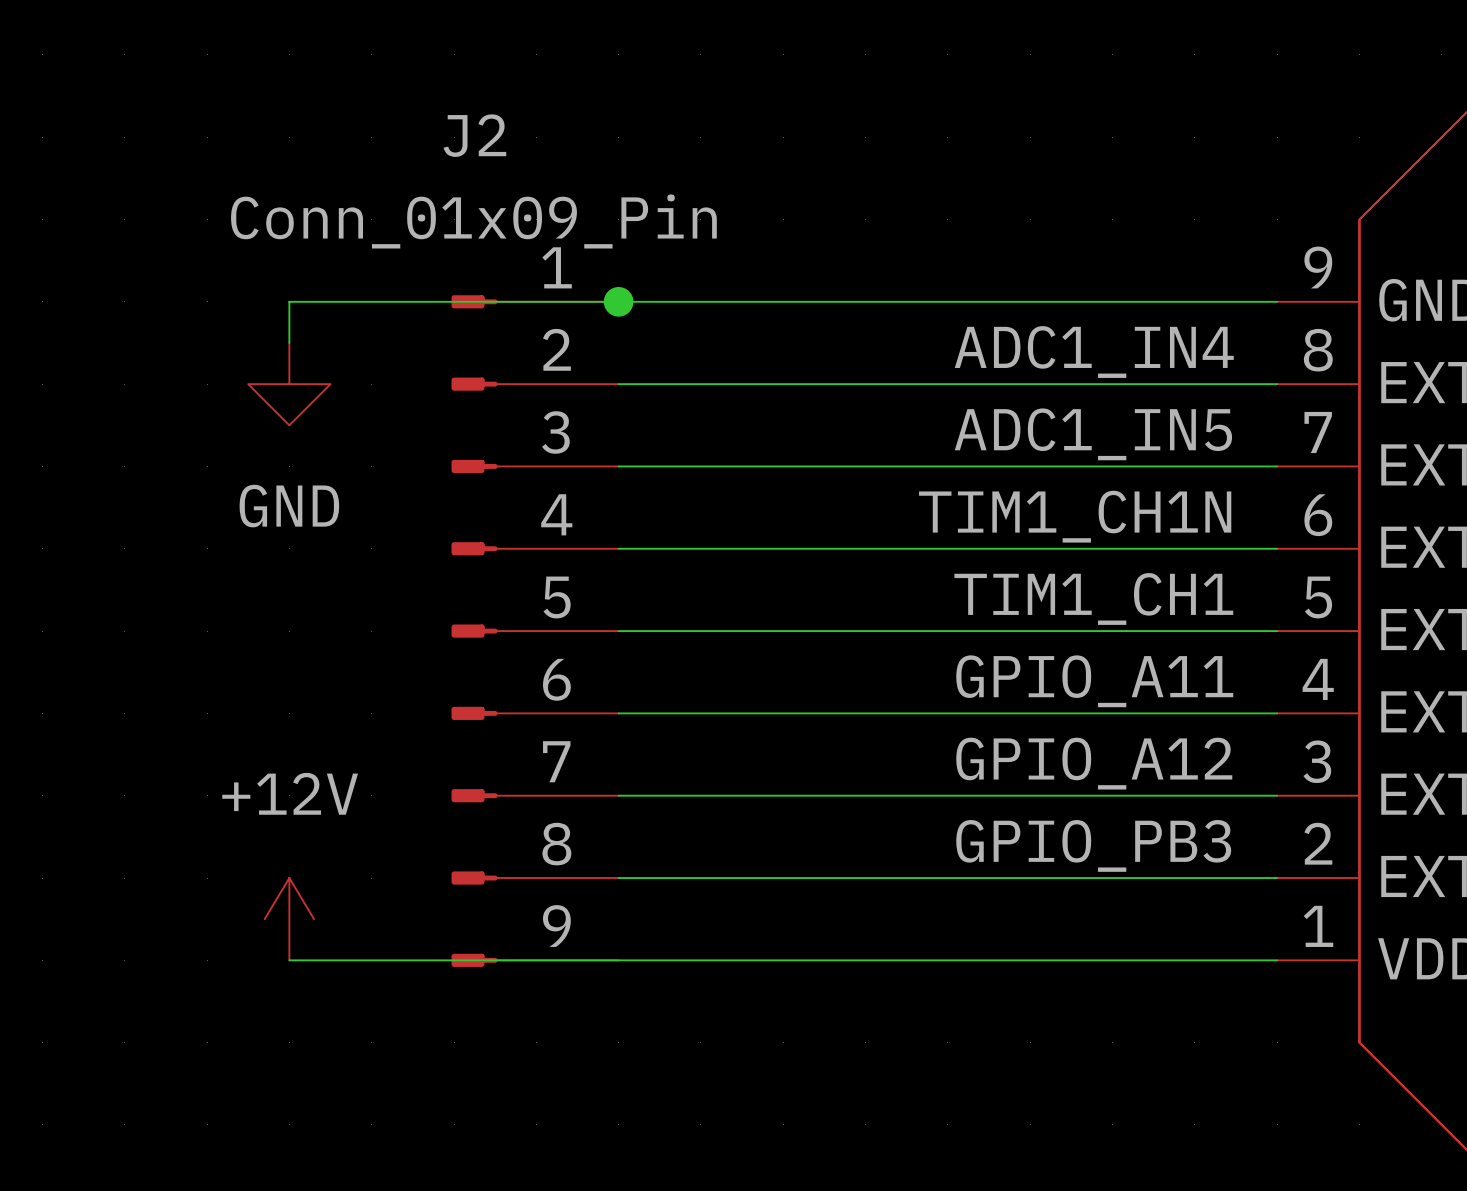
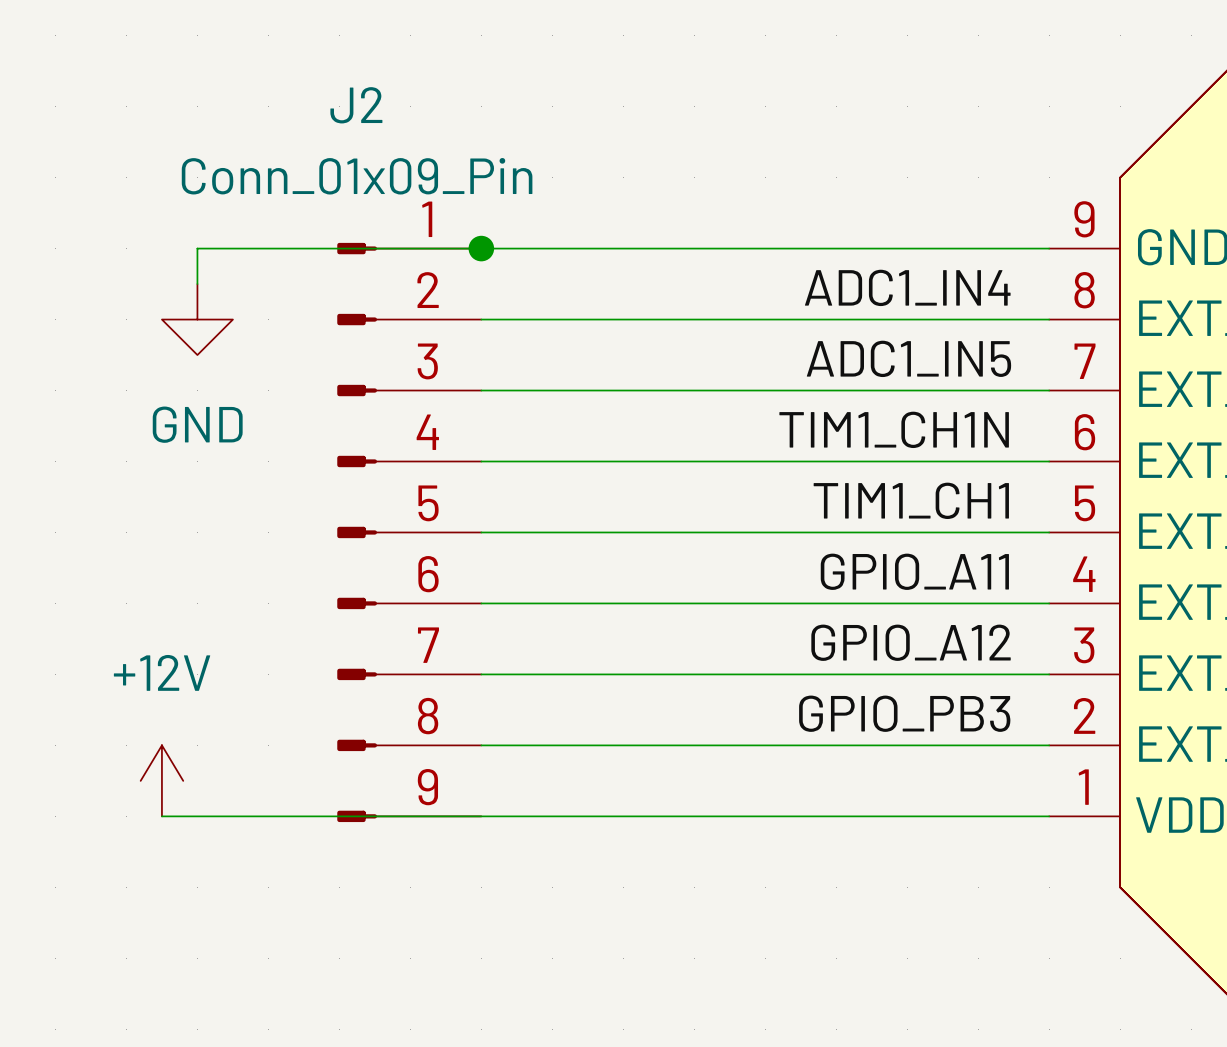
power symbol position: +12V (289, 919) -> +12V (161, 780)
wire: none -> (161, 816) (197, 816)

